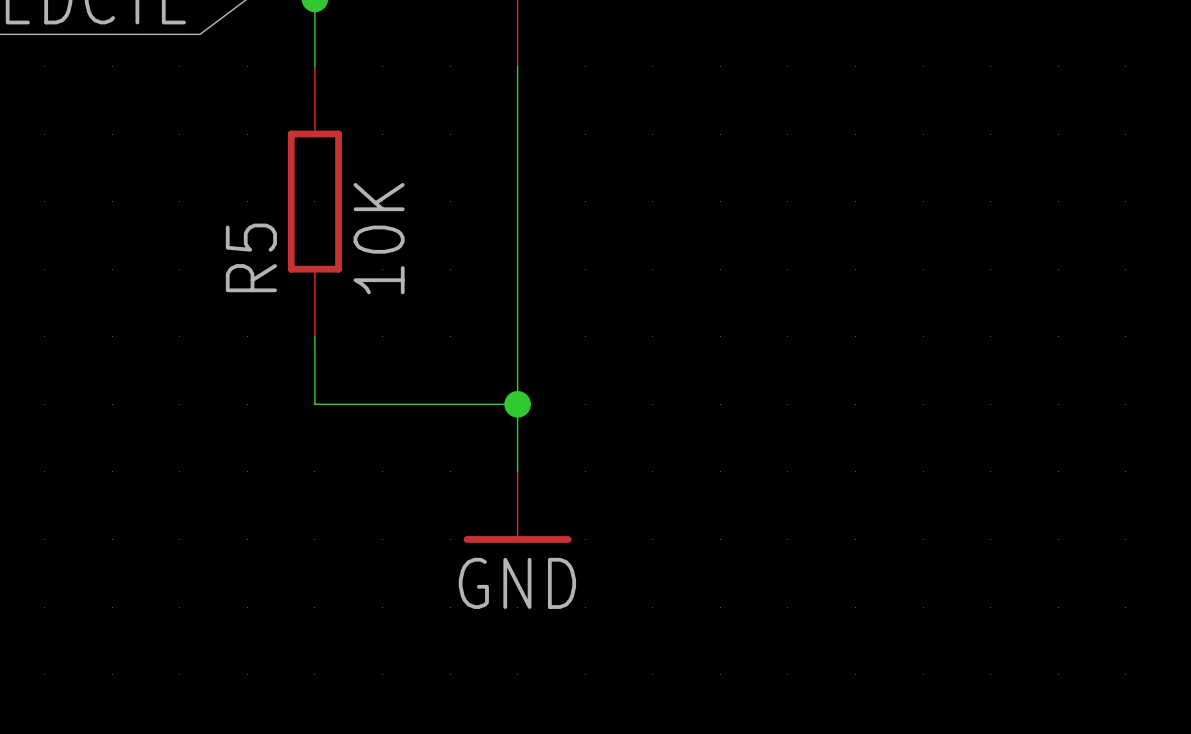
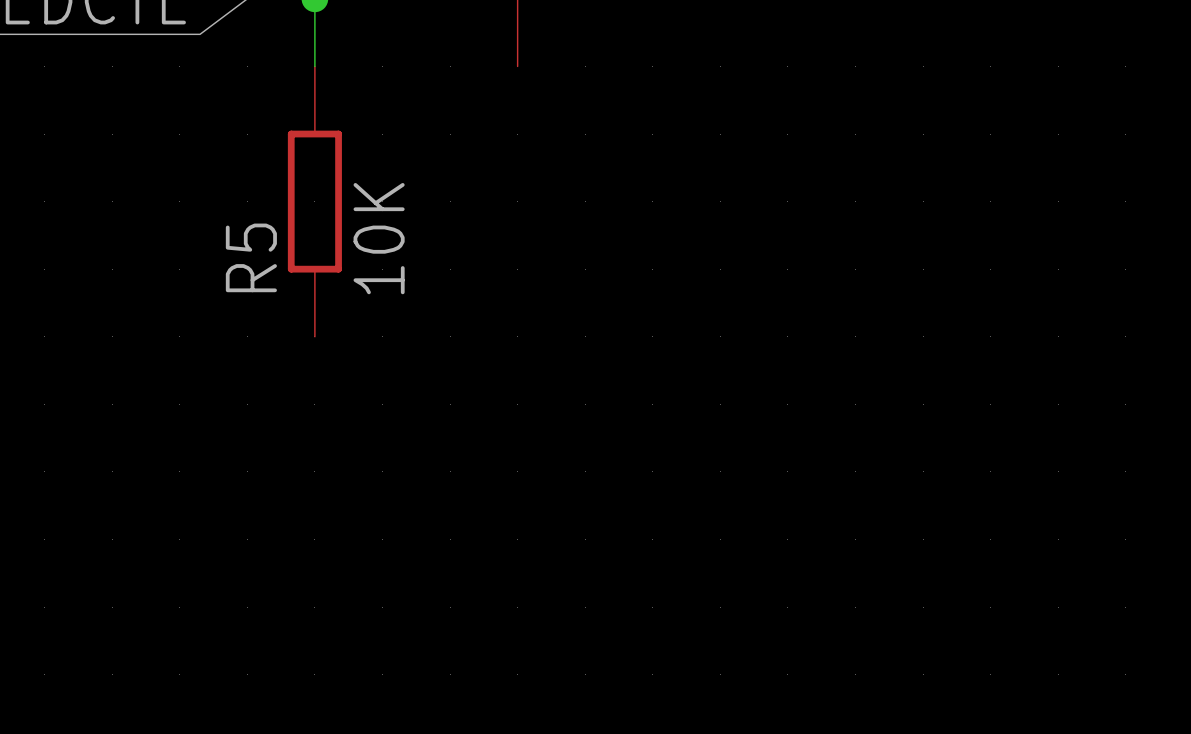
wire: (517, 66) (517, 471) -> none
wire: (314, 336) (314, 404) (517, 404) -> none
junction: (517, 404) -> none
power symbol: GND (517, 507) -> none

